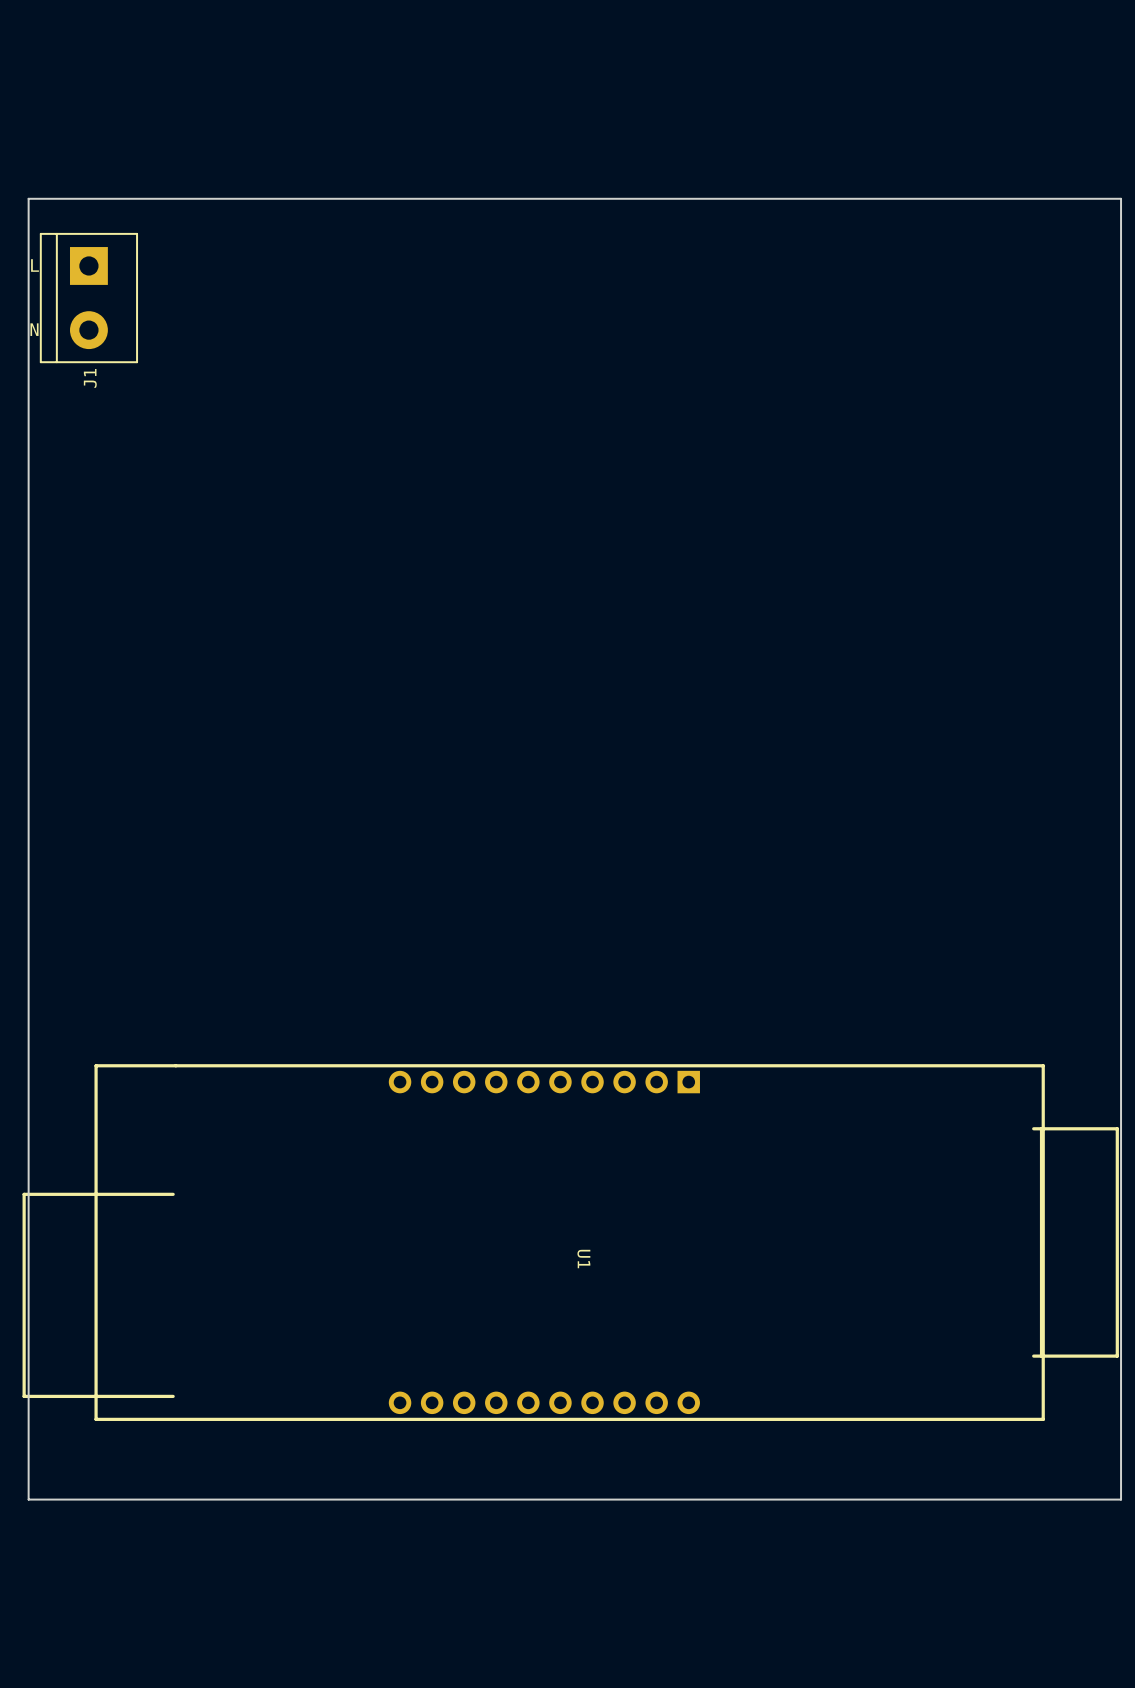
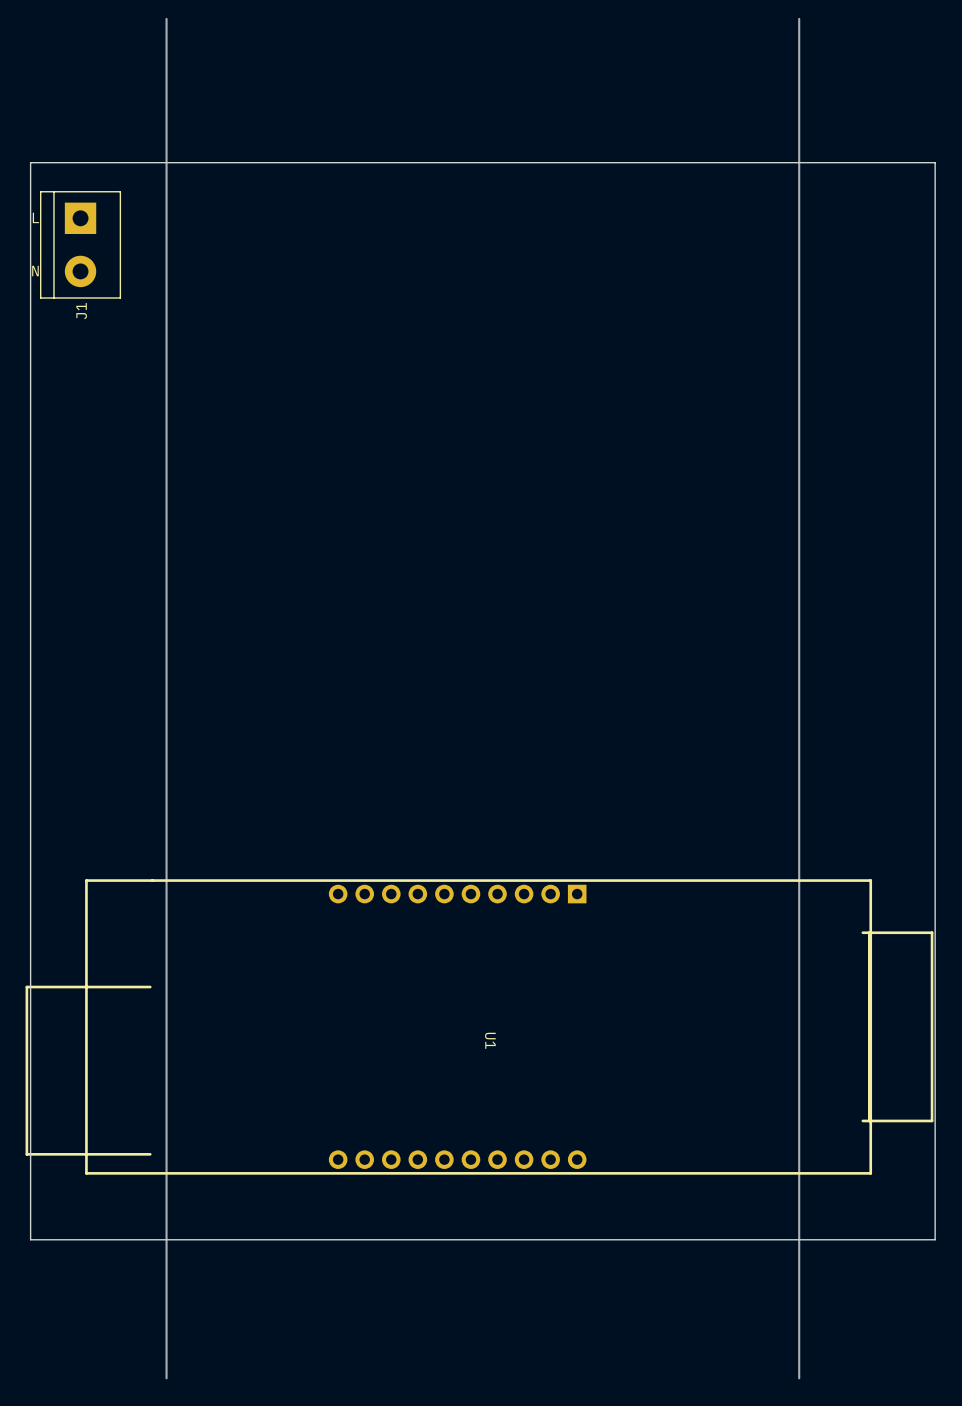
line: none -> (166, 18) (166, 1378)
line: none -> (799, 18) (799, 1378)

